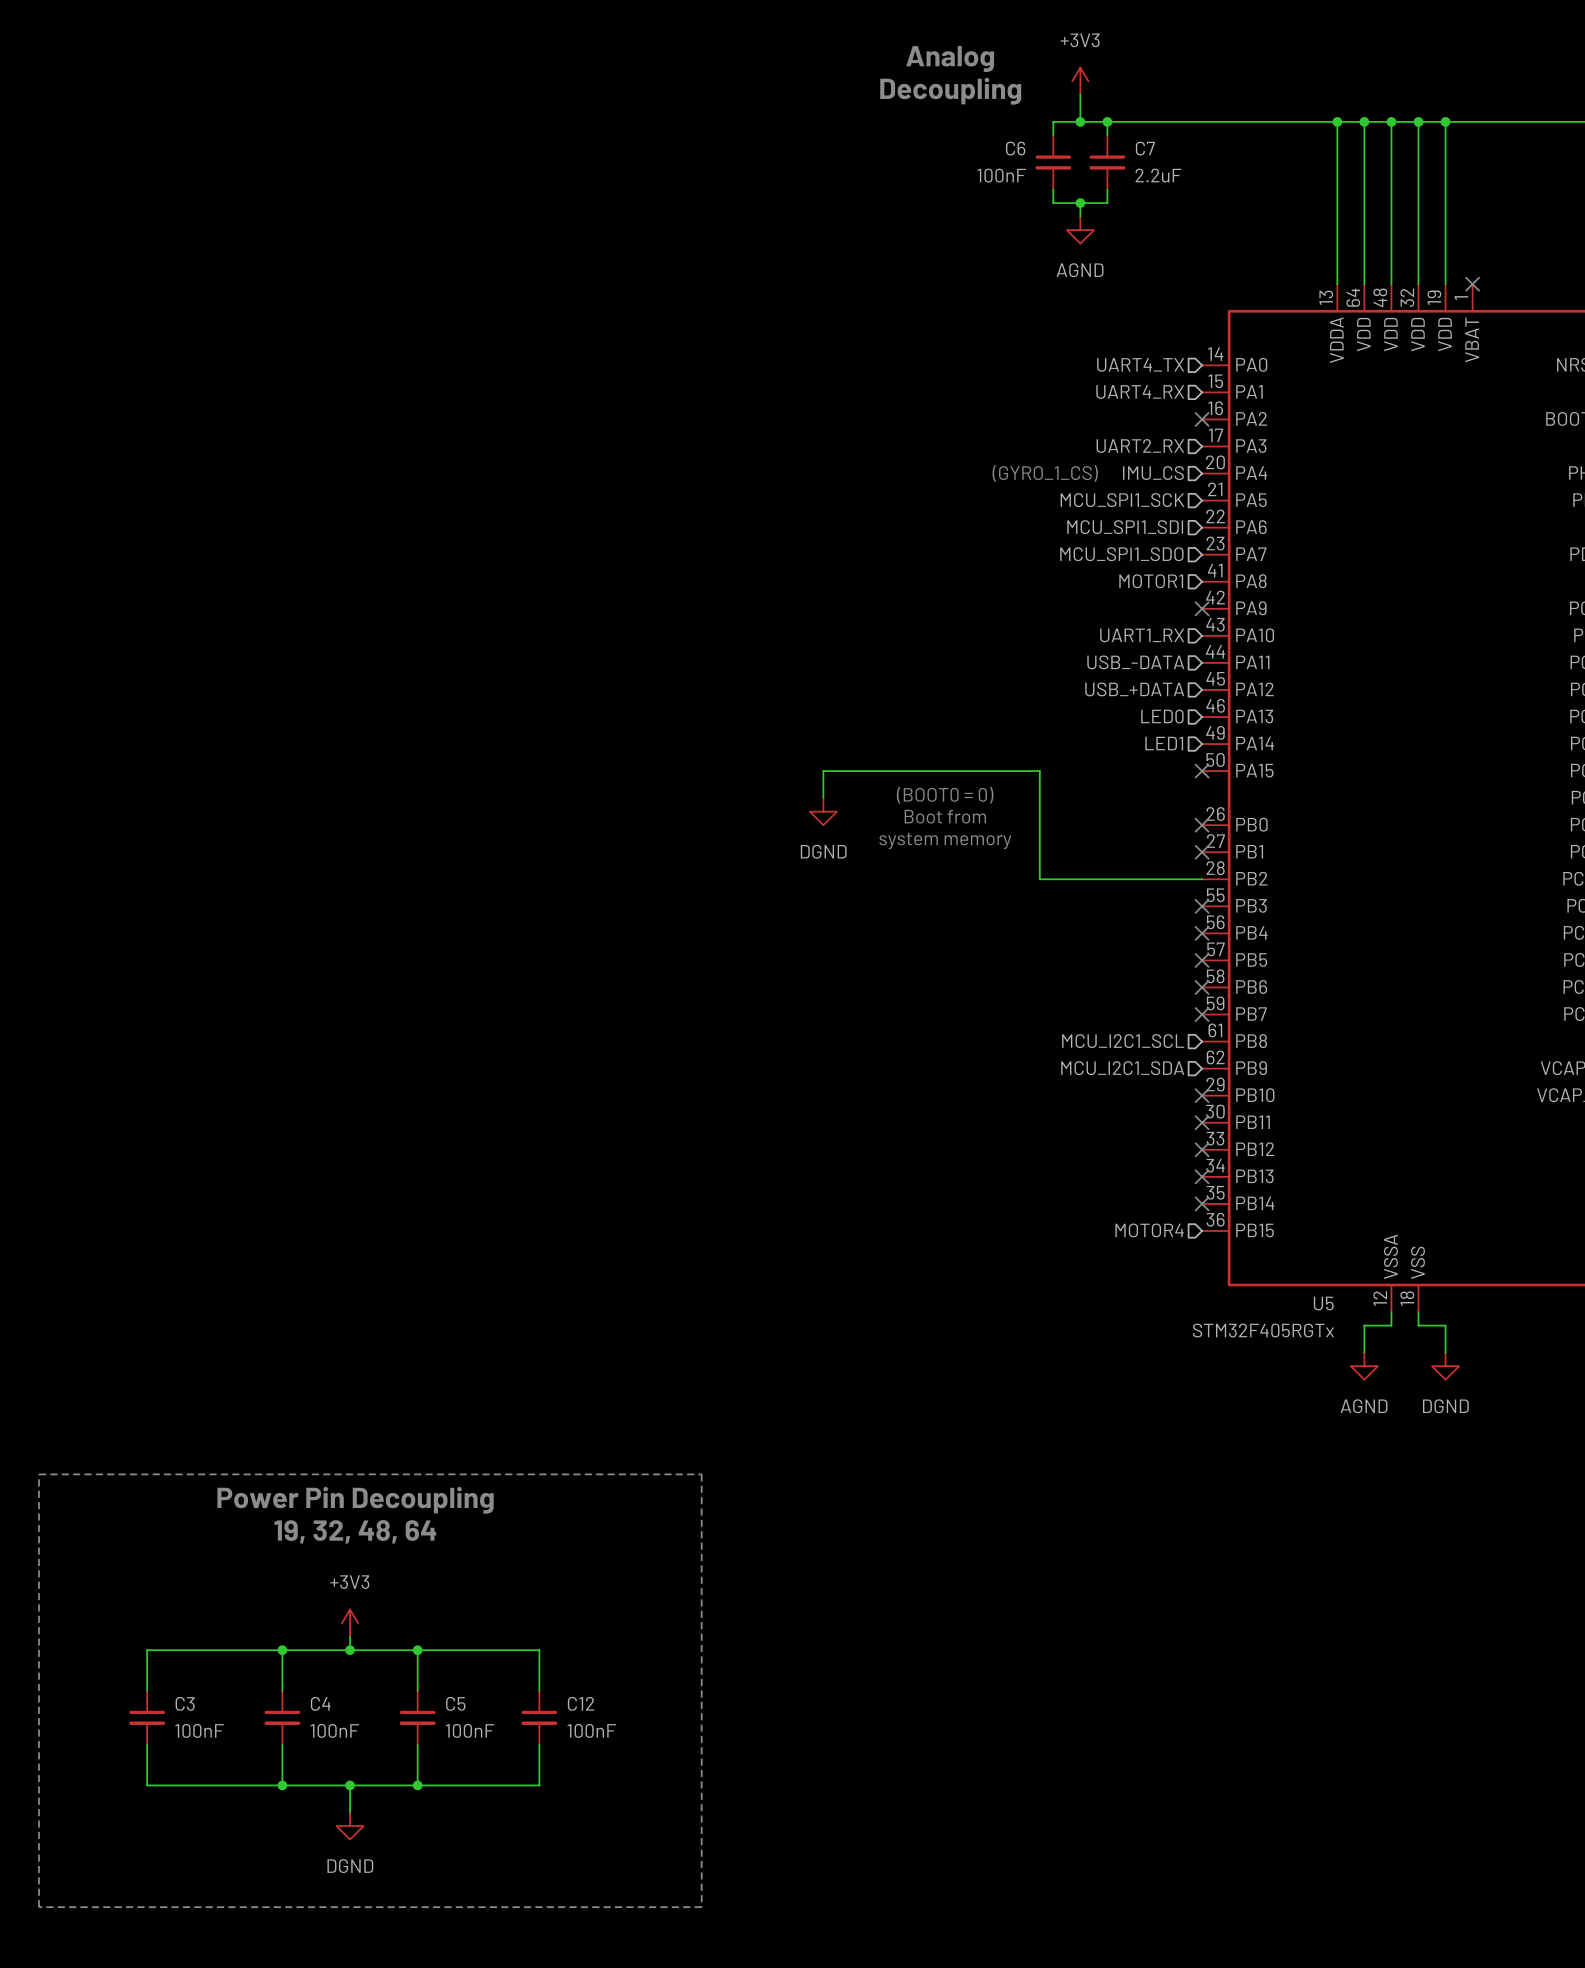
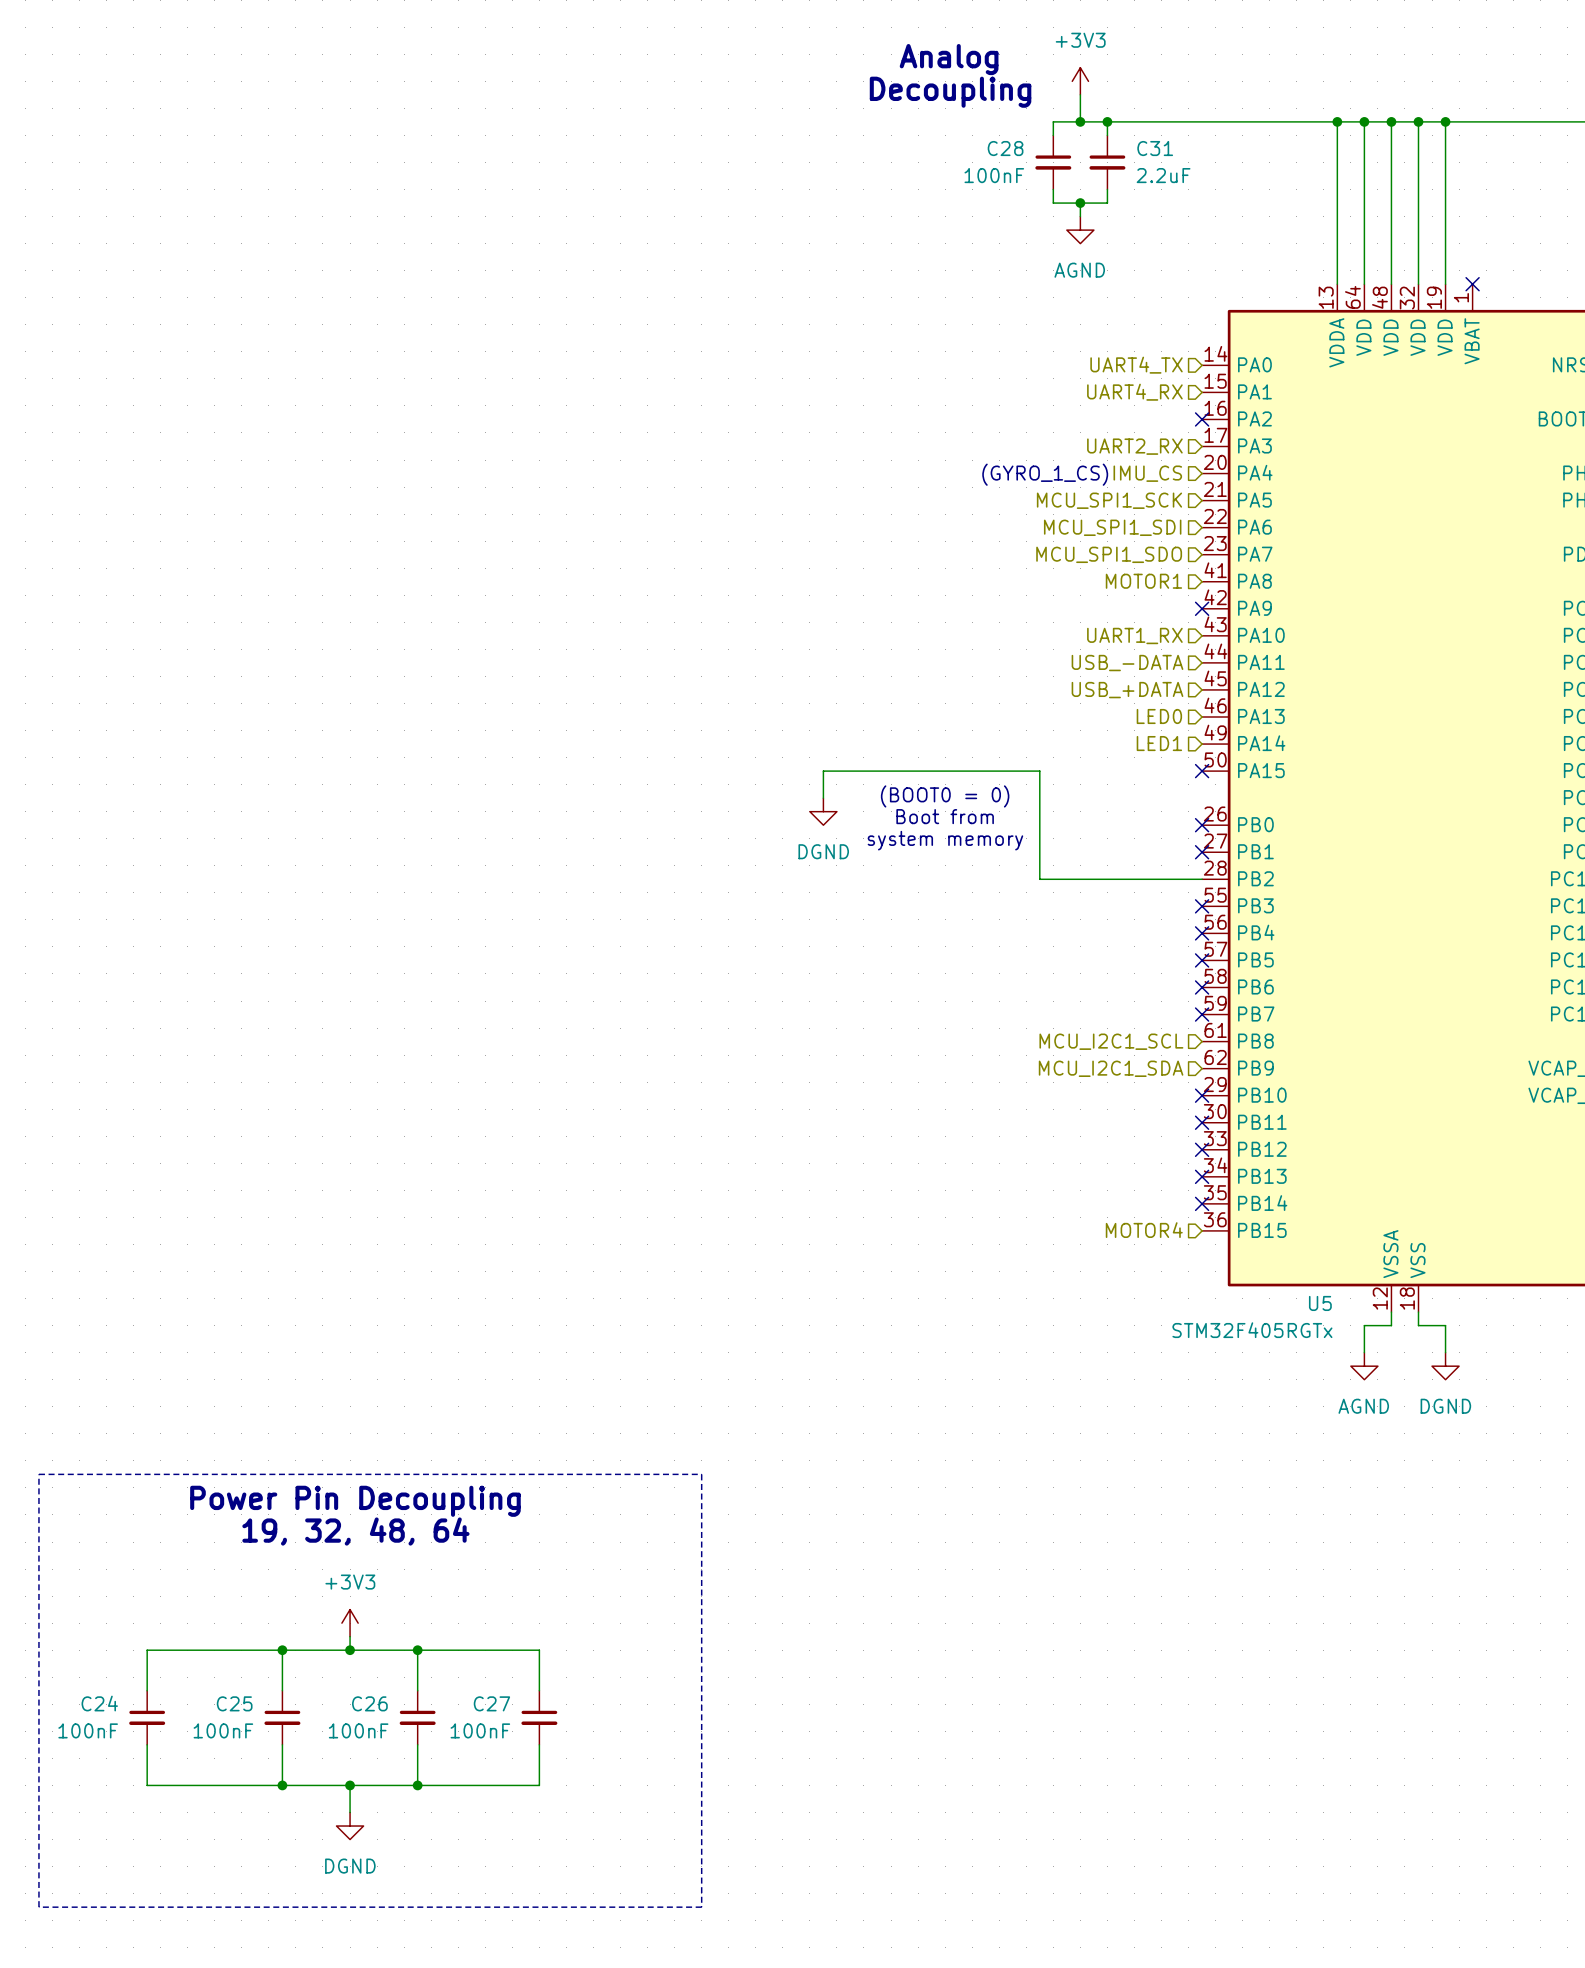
C6 name: C6 (1015, 148) -> C28 (1005, 148)
C7 name: C7 (1145, 148) -> C31 (1155, 148)
C3 name: C3 (185, 1703) -> C24 (99, 1703)
C4 name: C4 (320, 1703) -> C25 (234, 1703)
C5 name: C5 (455, 1703) -> C26 (369, 1703)
C12 name: C12 (580, 1703) -> C27 (491, 1703)
C3 value position: 100nF (199, 1730) -> 100nF (88, 1730)
C4 value position: 100nF (334, 1730) -> 100nF (223, 1730)
C5 value position: 100nF (470, 1730) -> 100nF (358, 1730)
C12 value position: 100nF (591, 1730) -> 100nF (480, 1730)

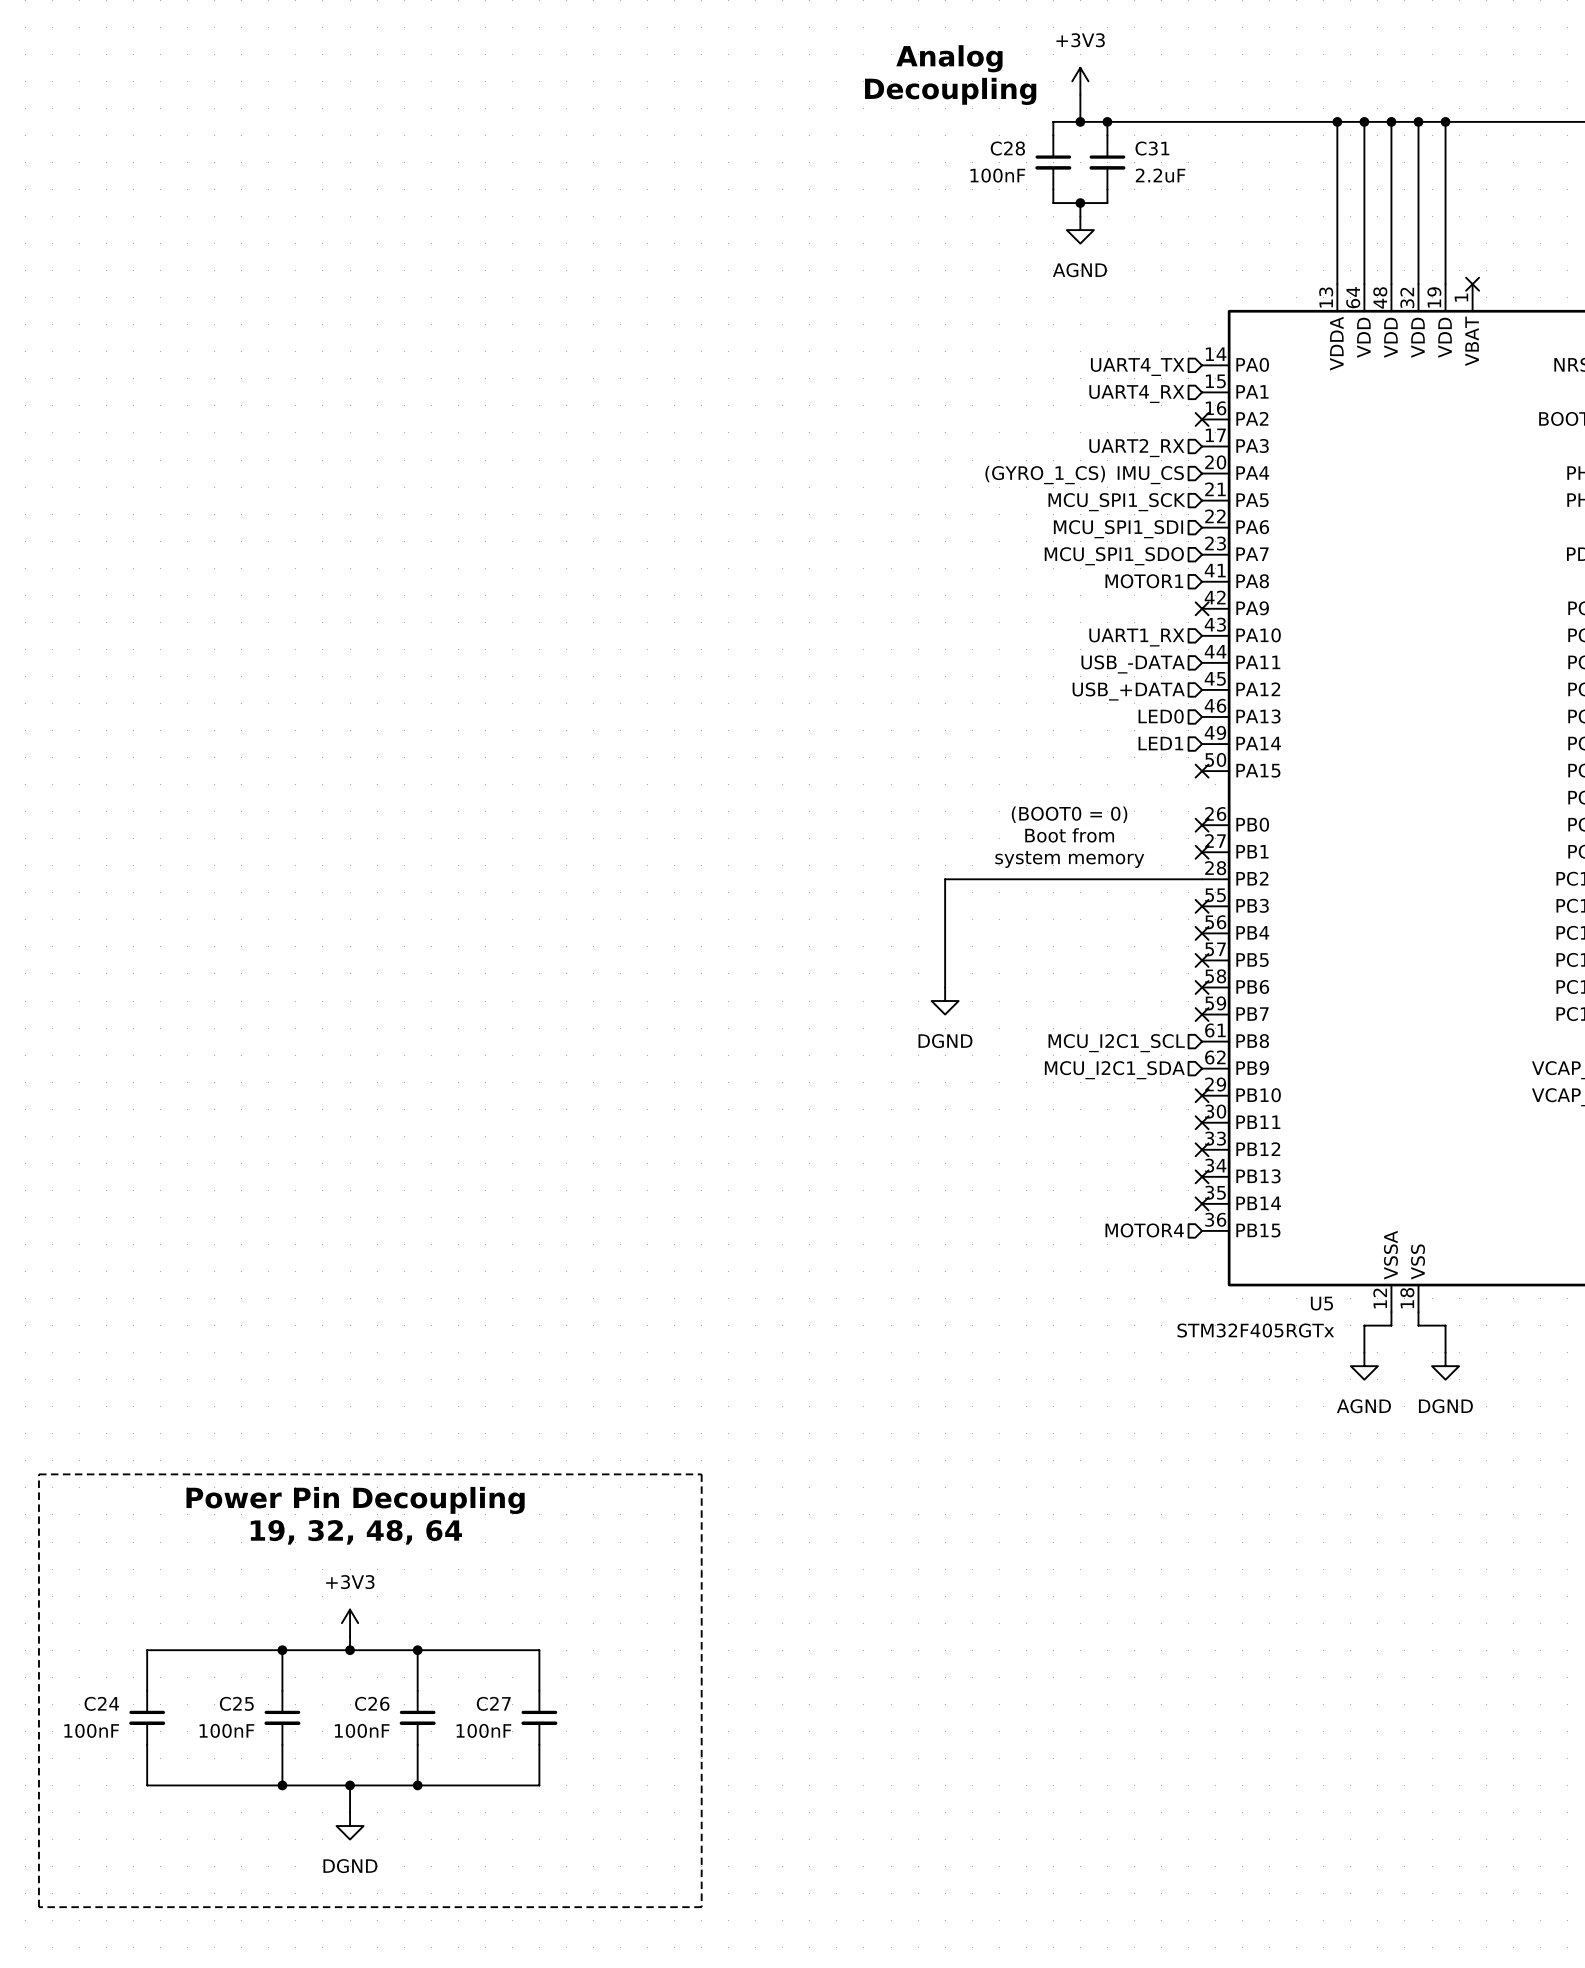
text position: (BOOT0 = 0) (945, 796) -> (BOOT0 = 0) (1069, 814)
wire: (823, 798) (823, 771) (1039, 771) (1039, 879) -> (945, 987) (945, 879) (1039, 879)
power symbol position: DGND (823, 811) -> DGND (945, 1001)
text position: Boot from (945, 816) -> Boot from (1069, 835)
text position: system memory (945, 840) -> system memory (1069, 859)

